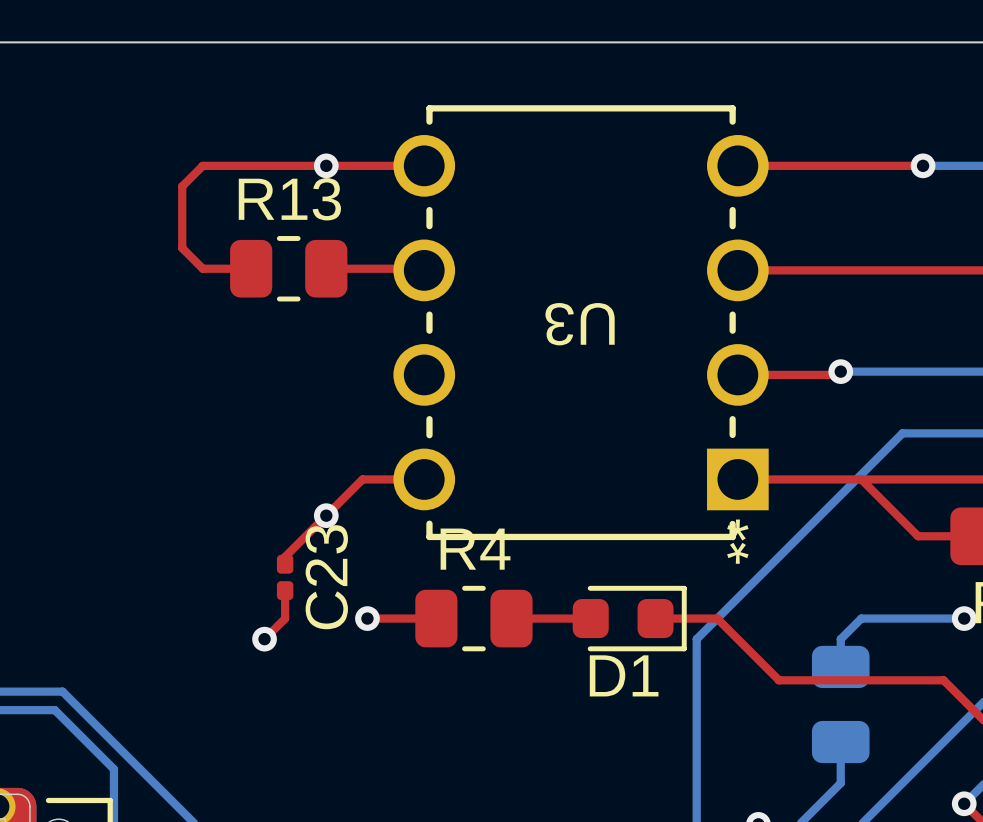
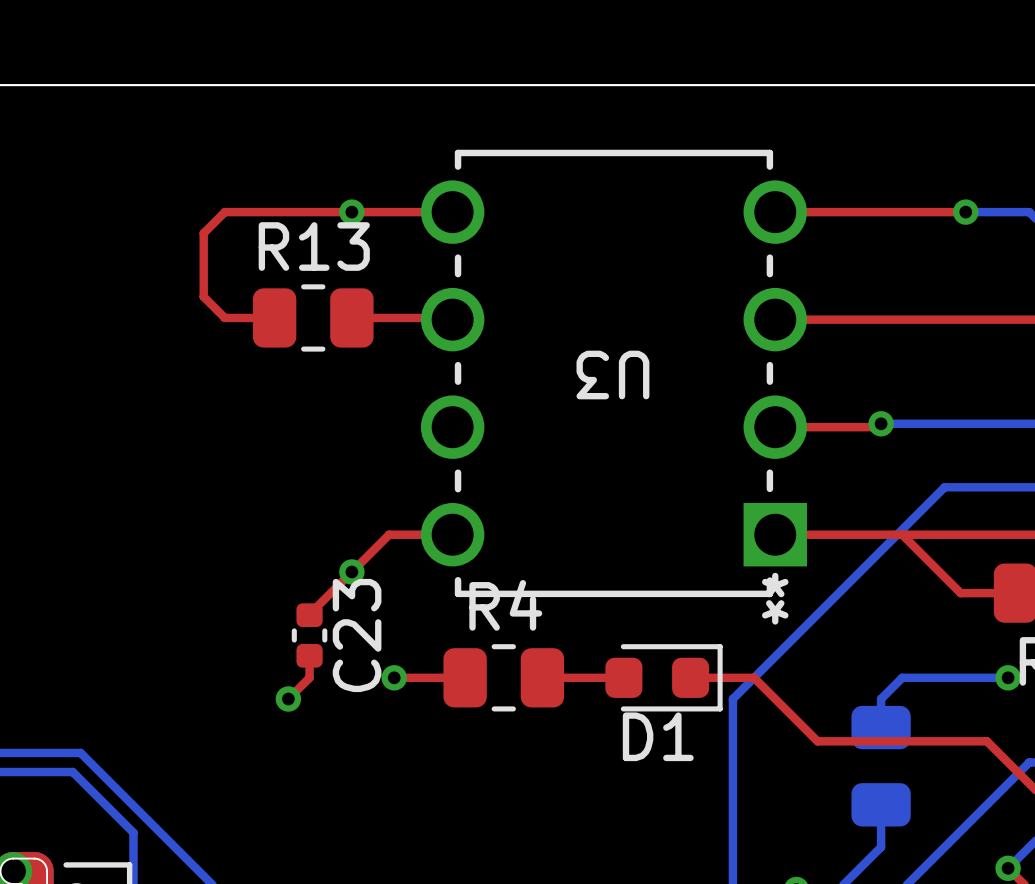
C23 footprint: [276, 554, 294, 601] -> [291, 603, 328, 668]

